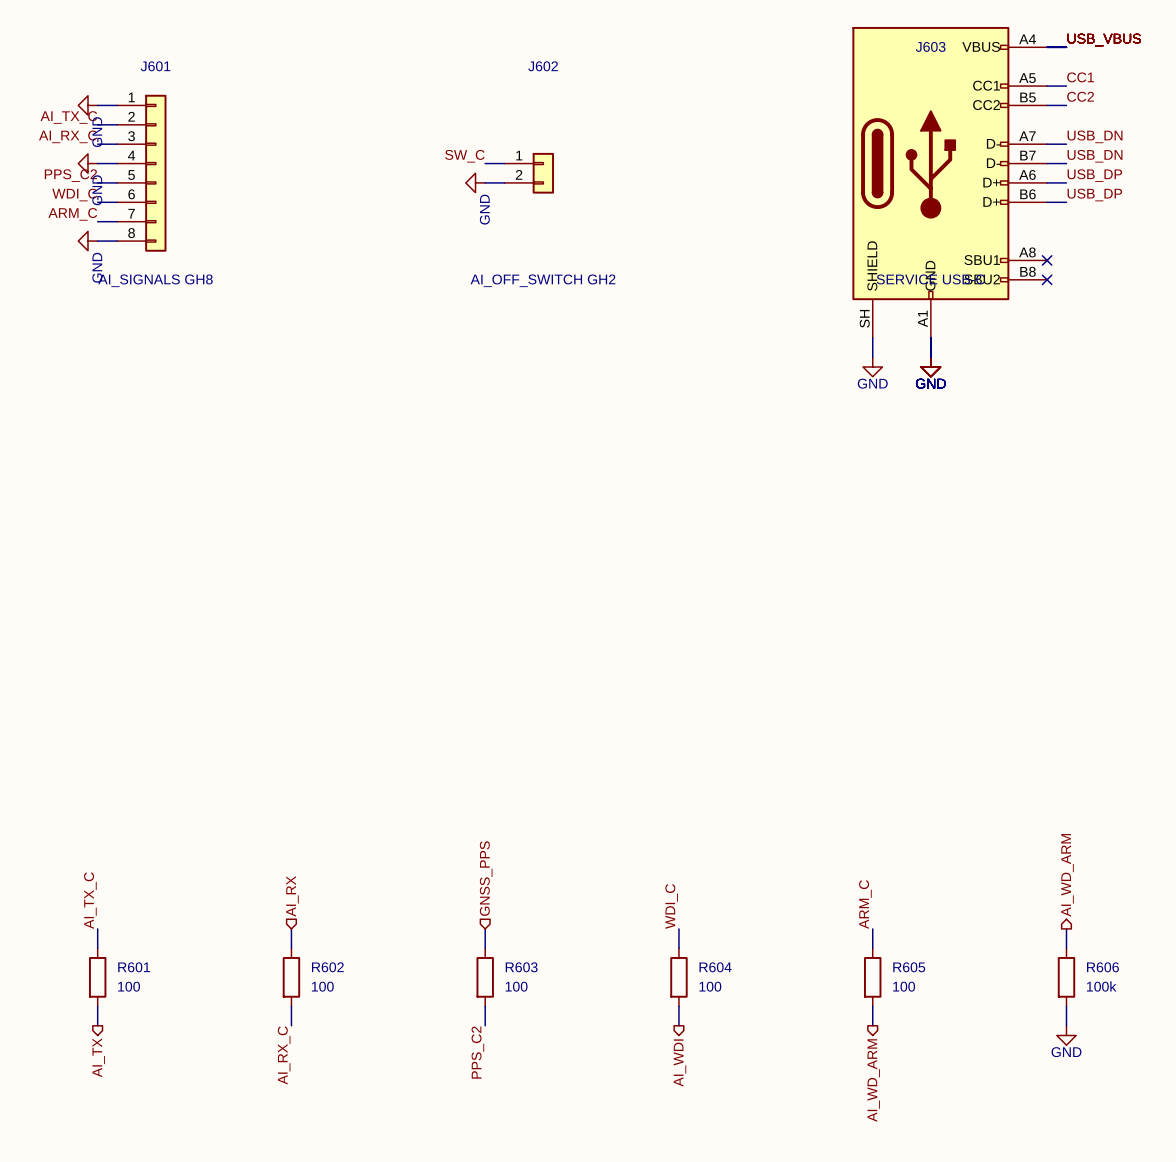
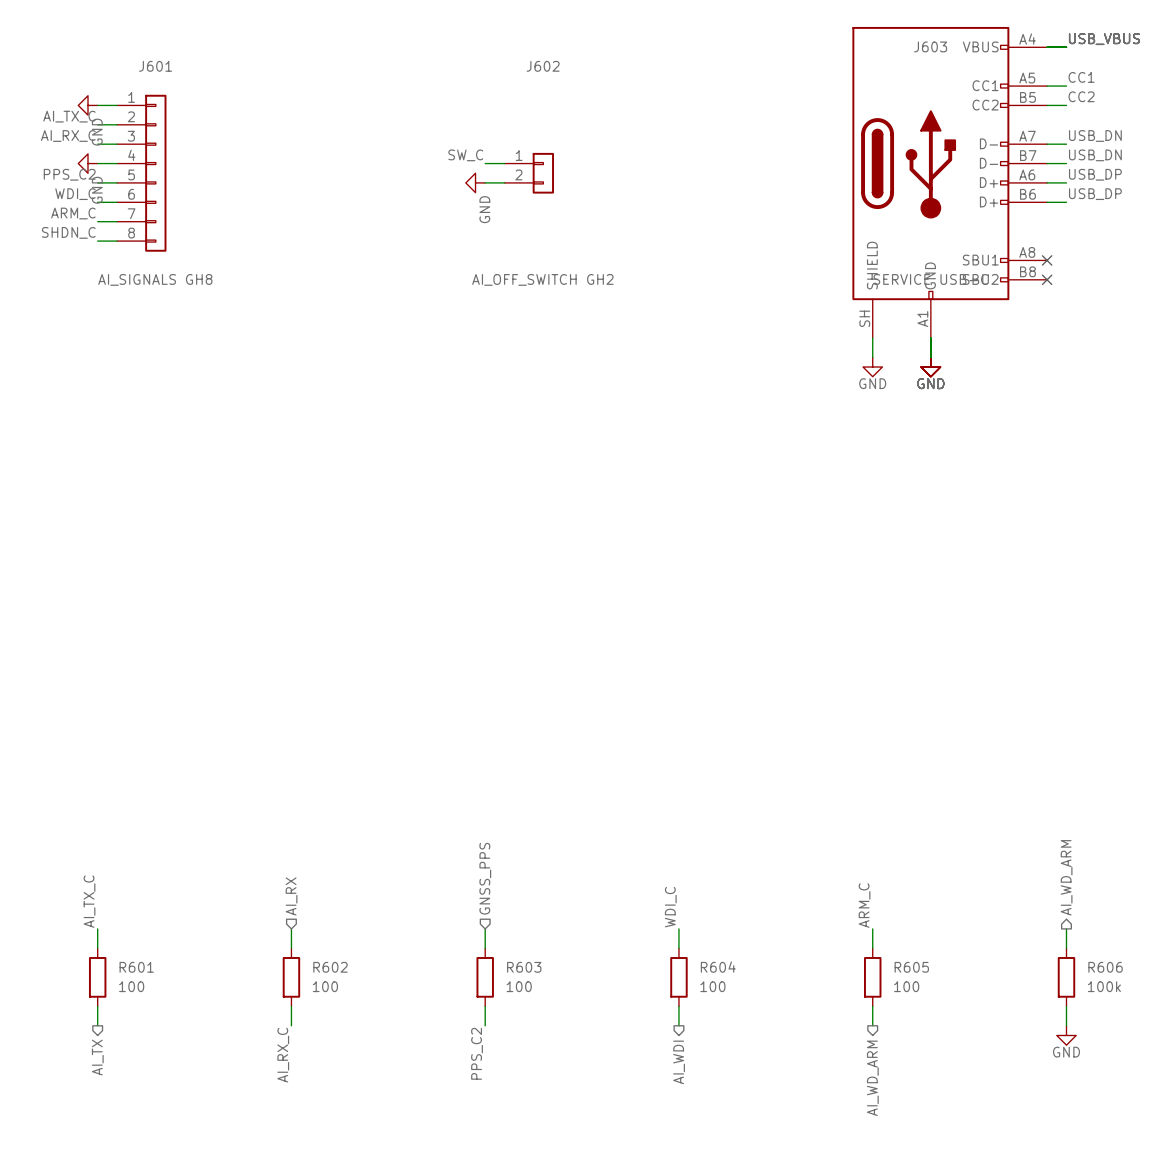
label: none -> SHDN_C (68, 232)
power symbol: GND (87, 241) -> none

